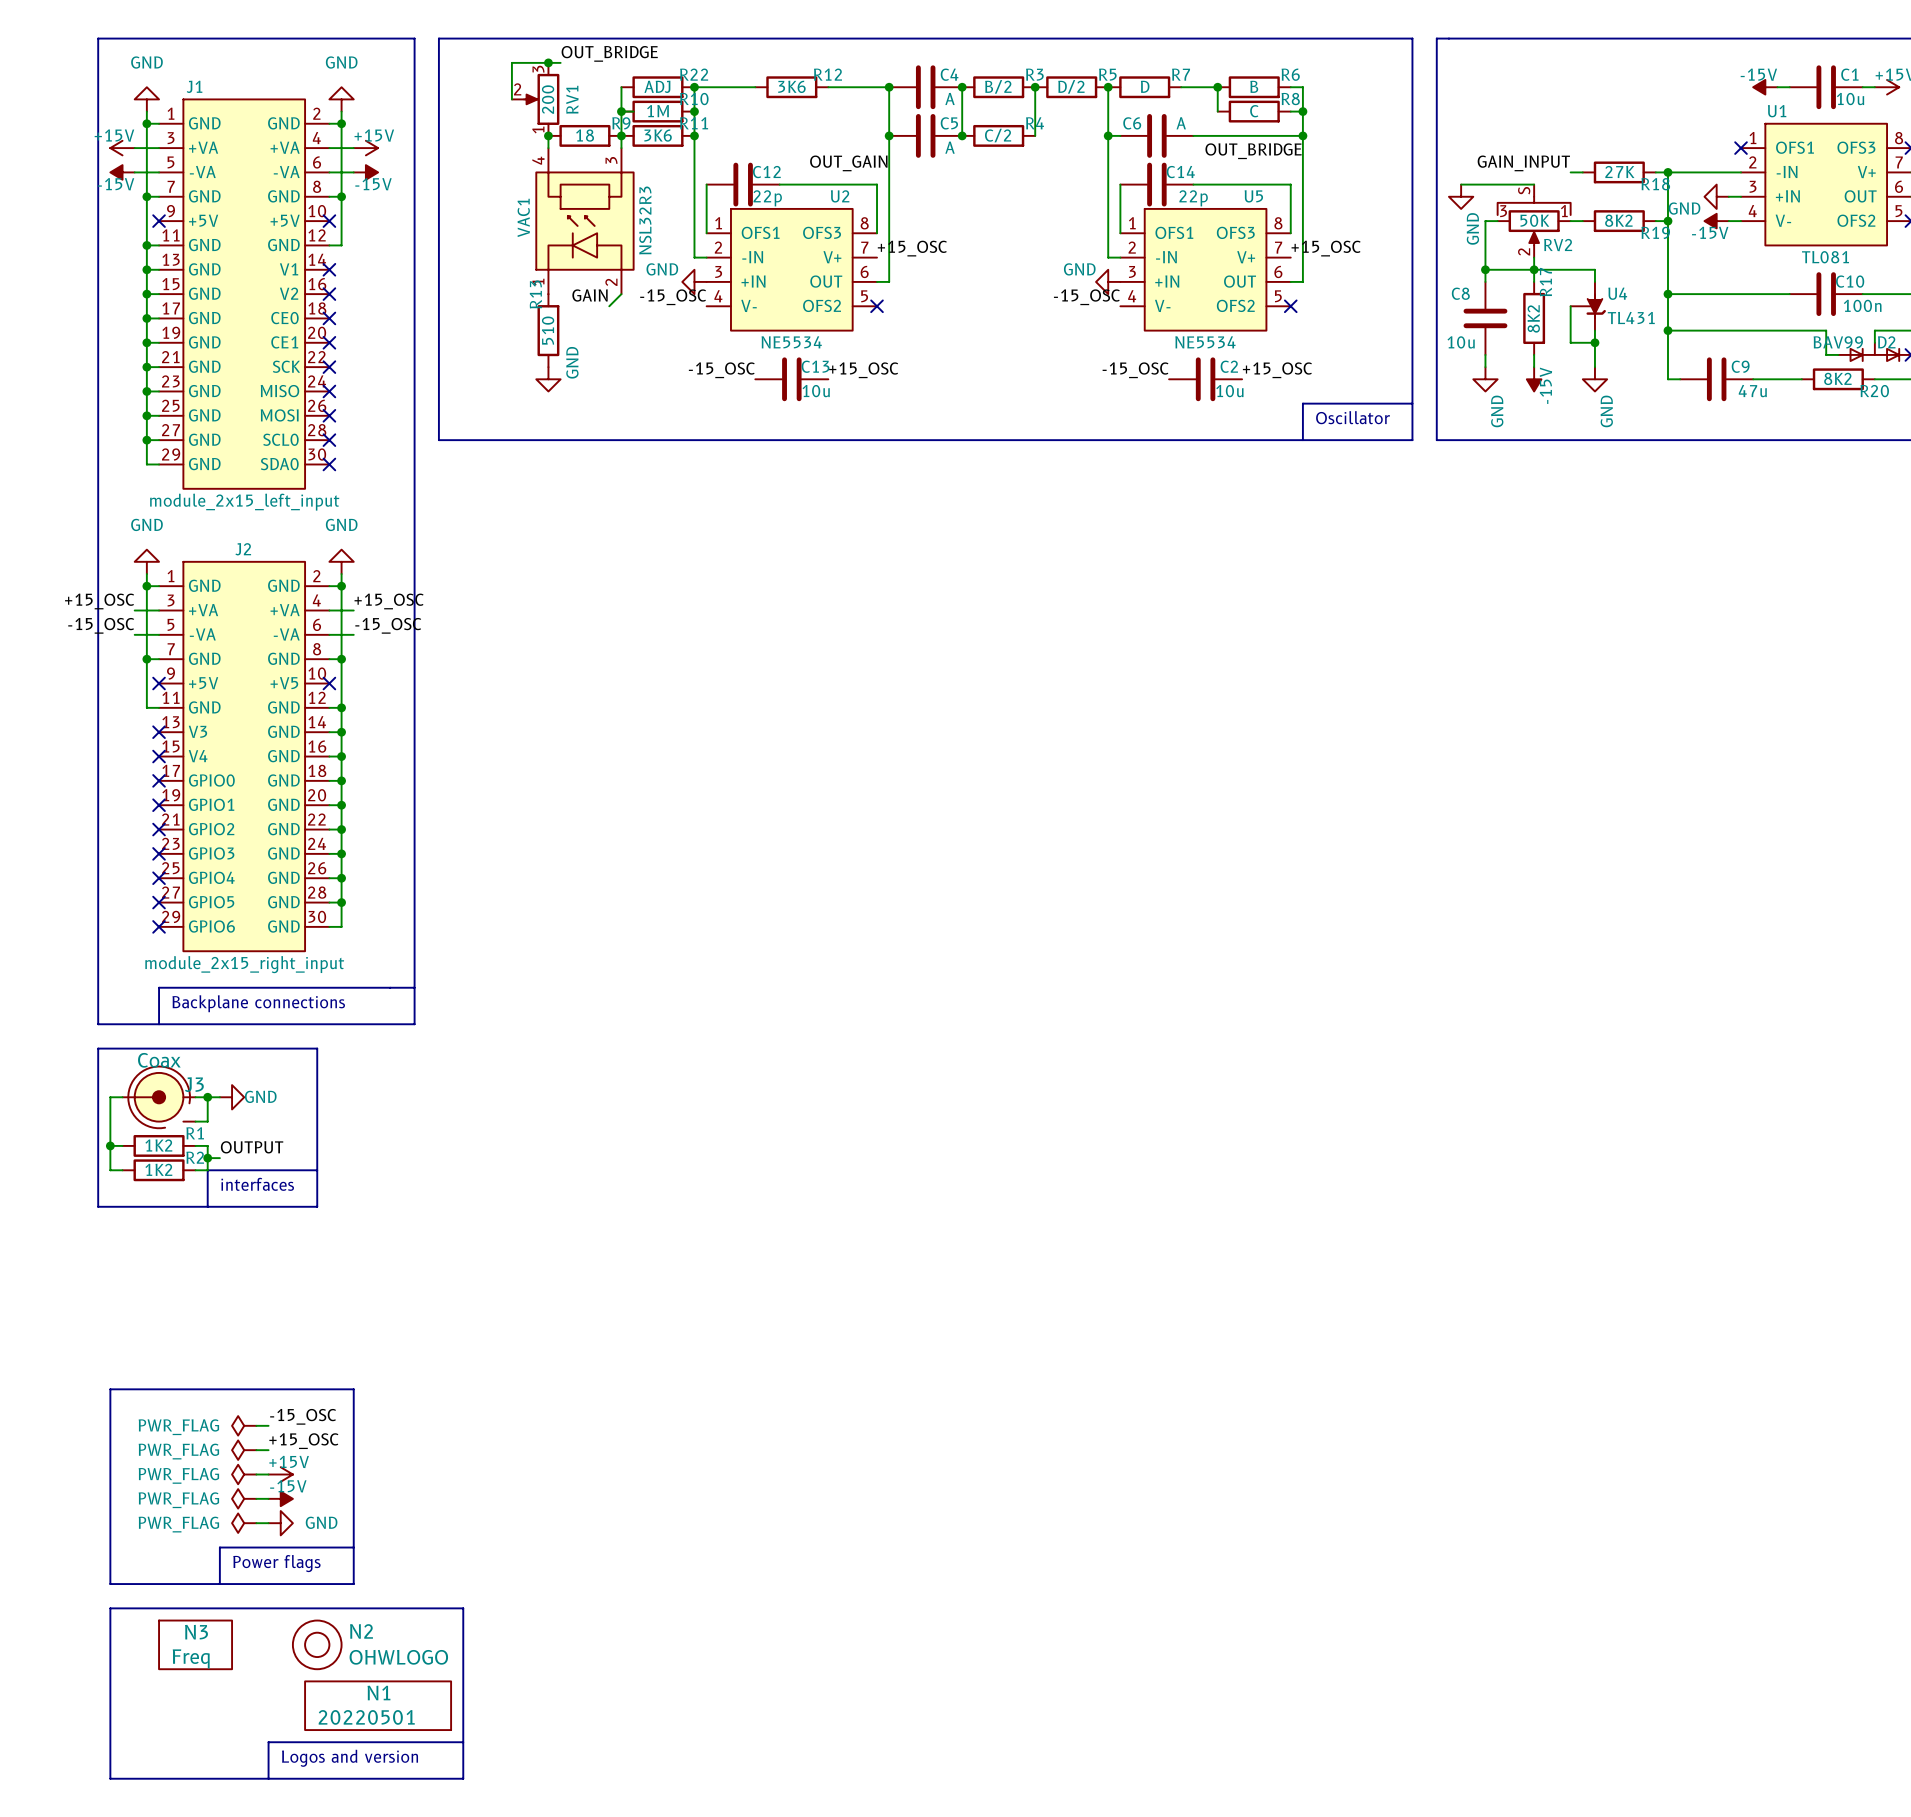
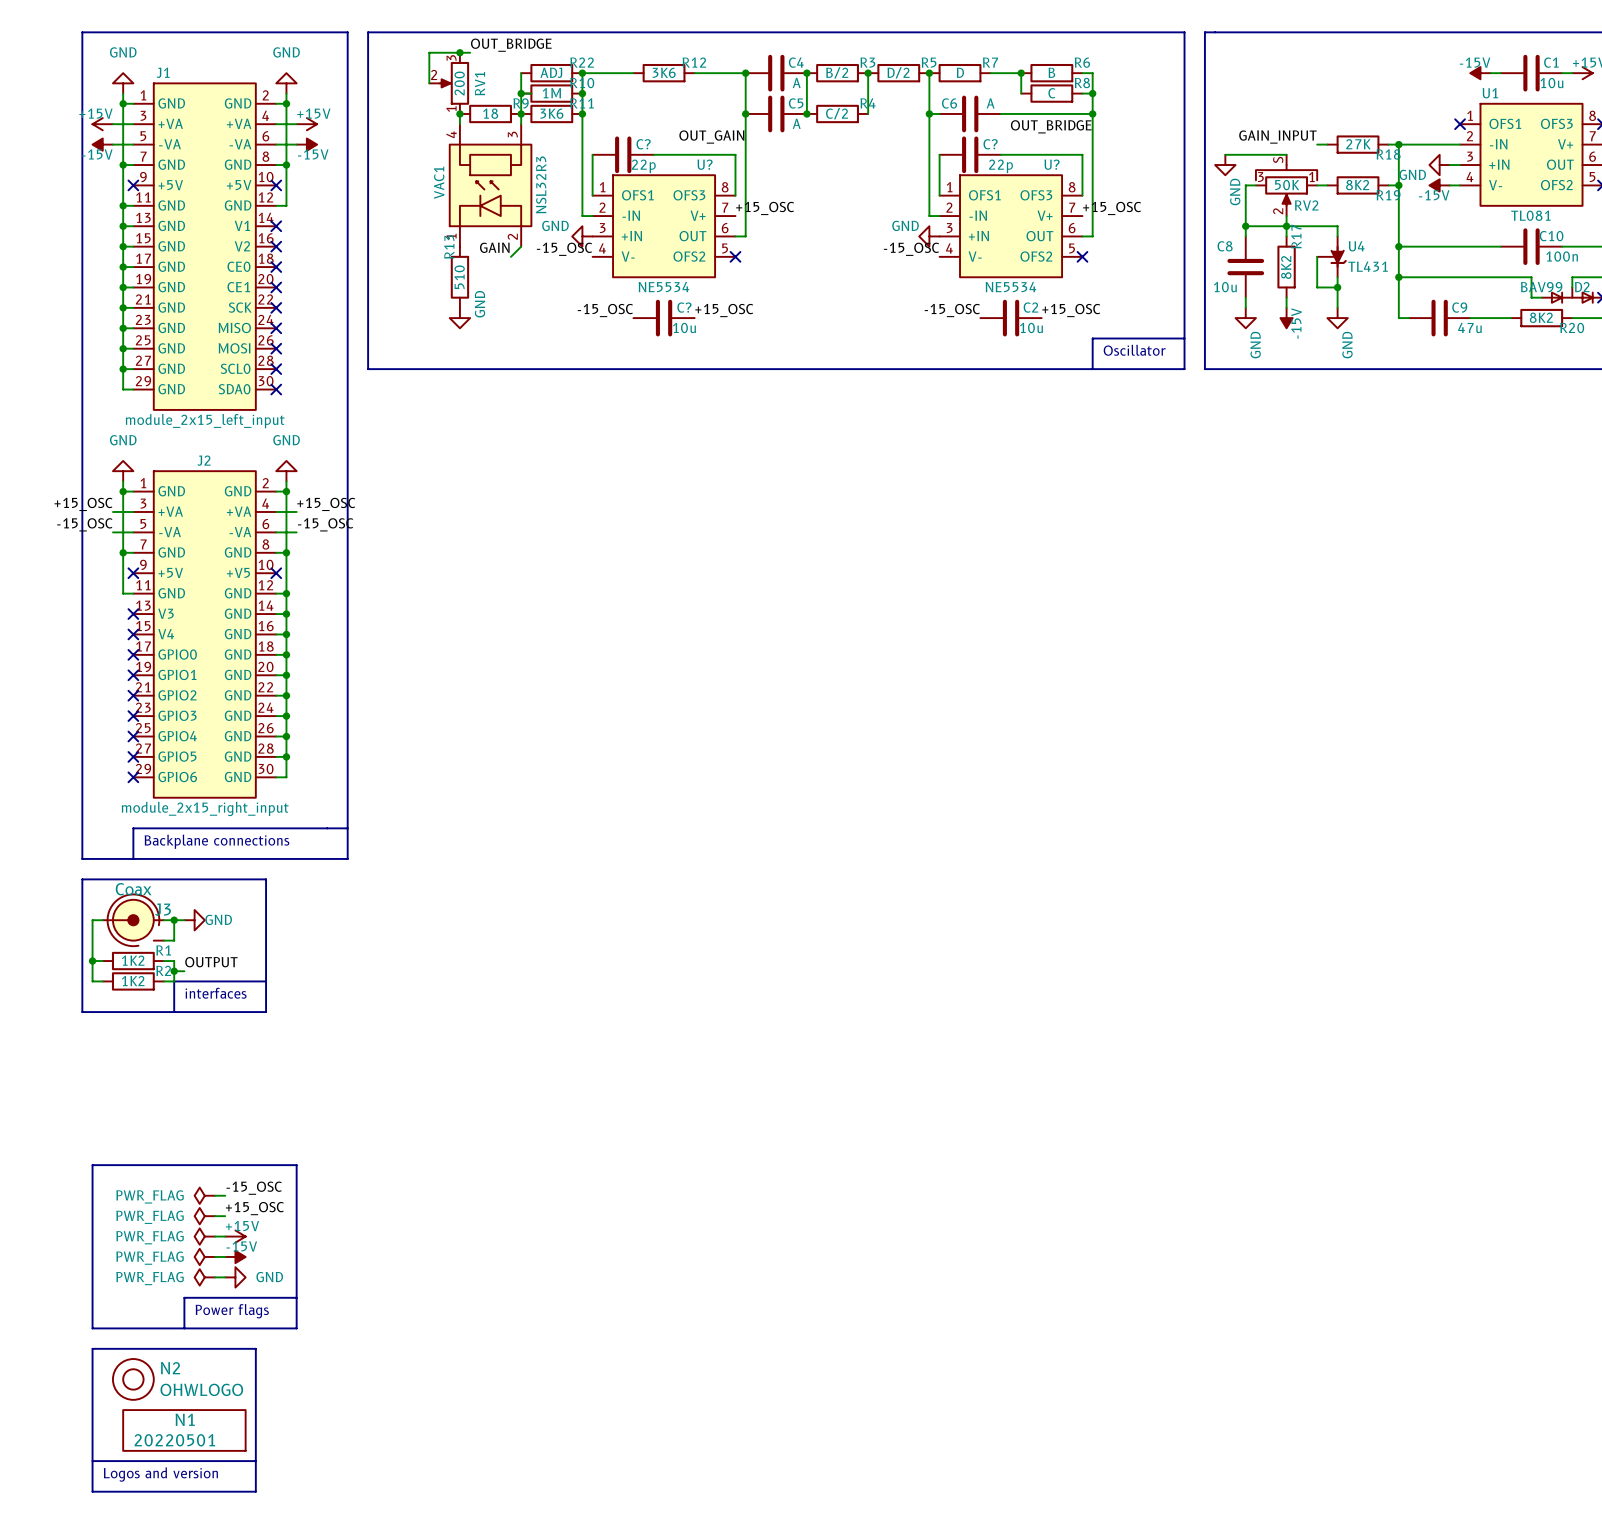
C12 name: C12 (766, 172) -> C? (643, 144)
C14 name: C14 (1180, 172) -> C? (990, 144)
U2 name: U2 (840, 196) -> U? (705, 164)
U5 name: U5 (1253, 196) -> U? (1052, 164)
C13 name: C13 (815, 366) -> C? (684, 307)
line: (305, 1608) (463, 1608) (463, 1778) (305, 1778) -> (255, 1348) (255, 1491)
N3: Freq (195, 1644) -> none
N2 position: (317, 1644) -> (133, 1379)
N1 position: (378, 1705) -> (184, 1430)
line: (268, 1742) (268, 1778) -> (225, 1461) (92, 1461)
line: (305, 1742) (463, 1742) -> none
text position: Logos and version (350, 1758) -> Logos and version (160, 1474)

